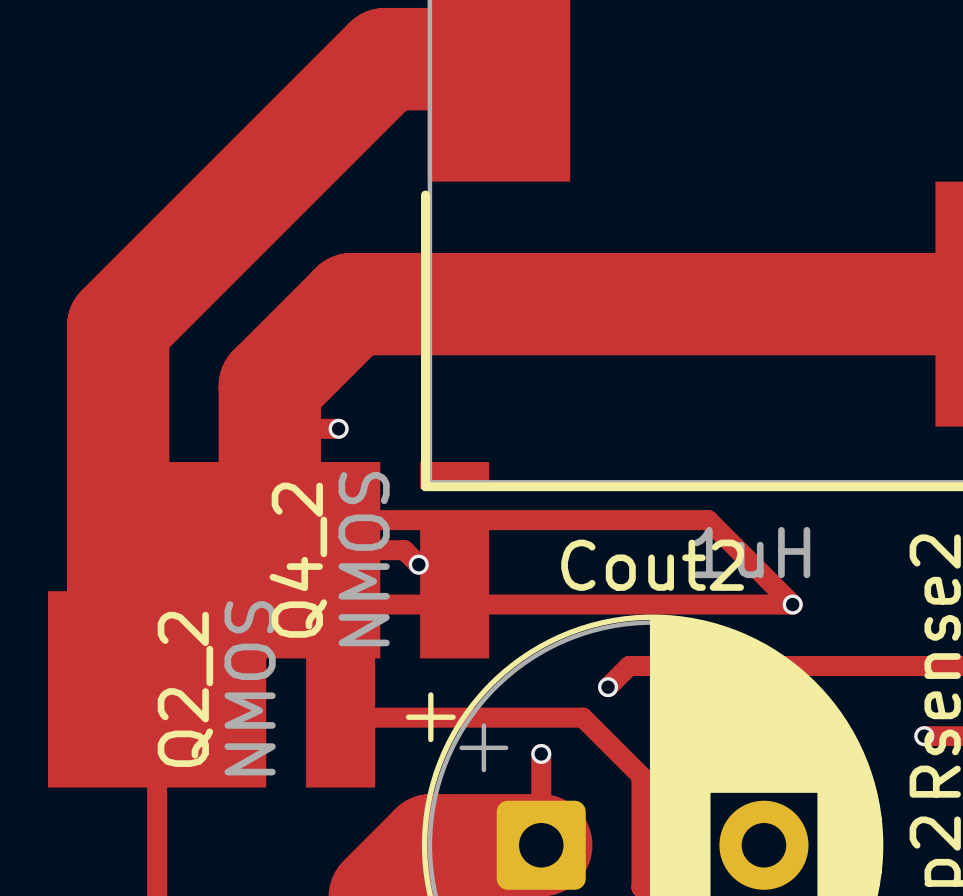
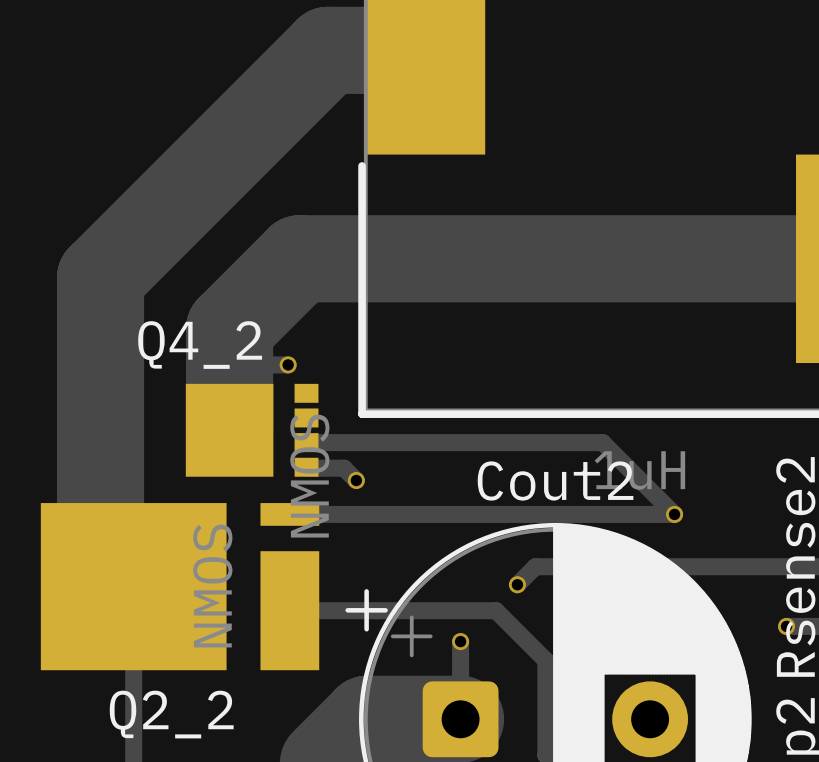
Q4_2 footprint: [162, 462, 490, 659] -> [185, 383, 319, 477]
Q4_2 name position: Q4_2 (298, 560) -> Q4_2 (200, 345)
Q2_2 name rotation: 0° (185, 689) -> 90° clockwise (171, 714)

